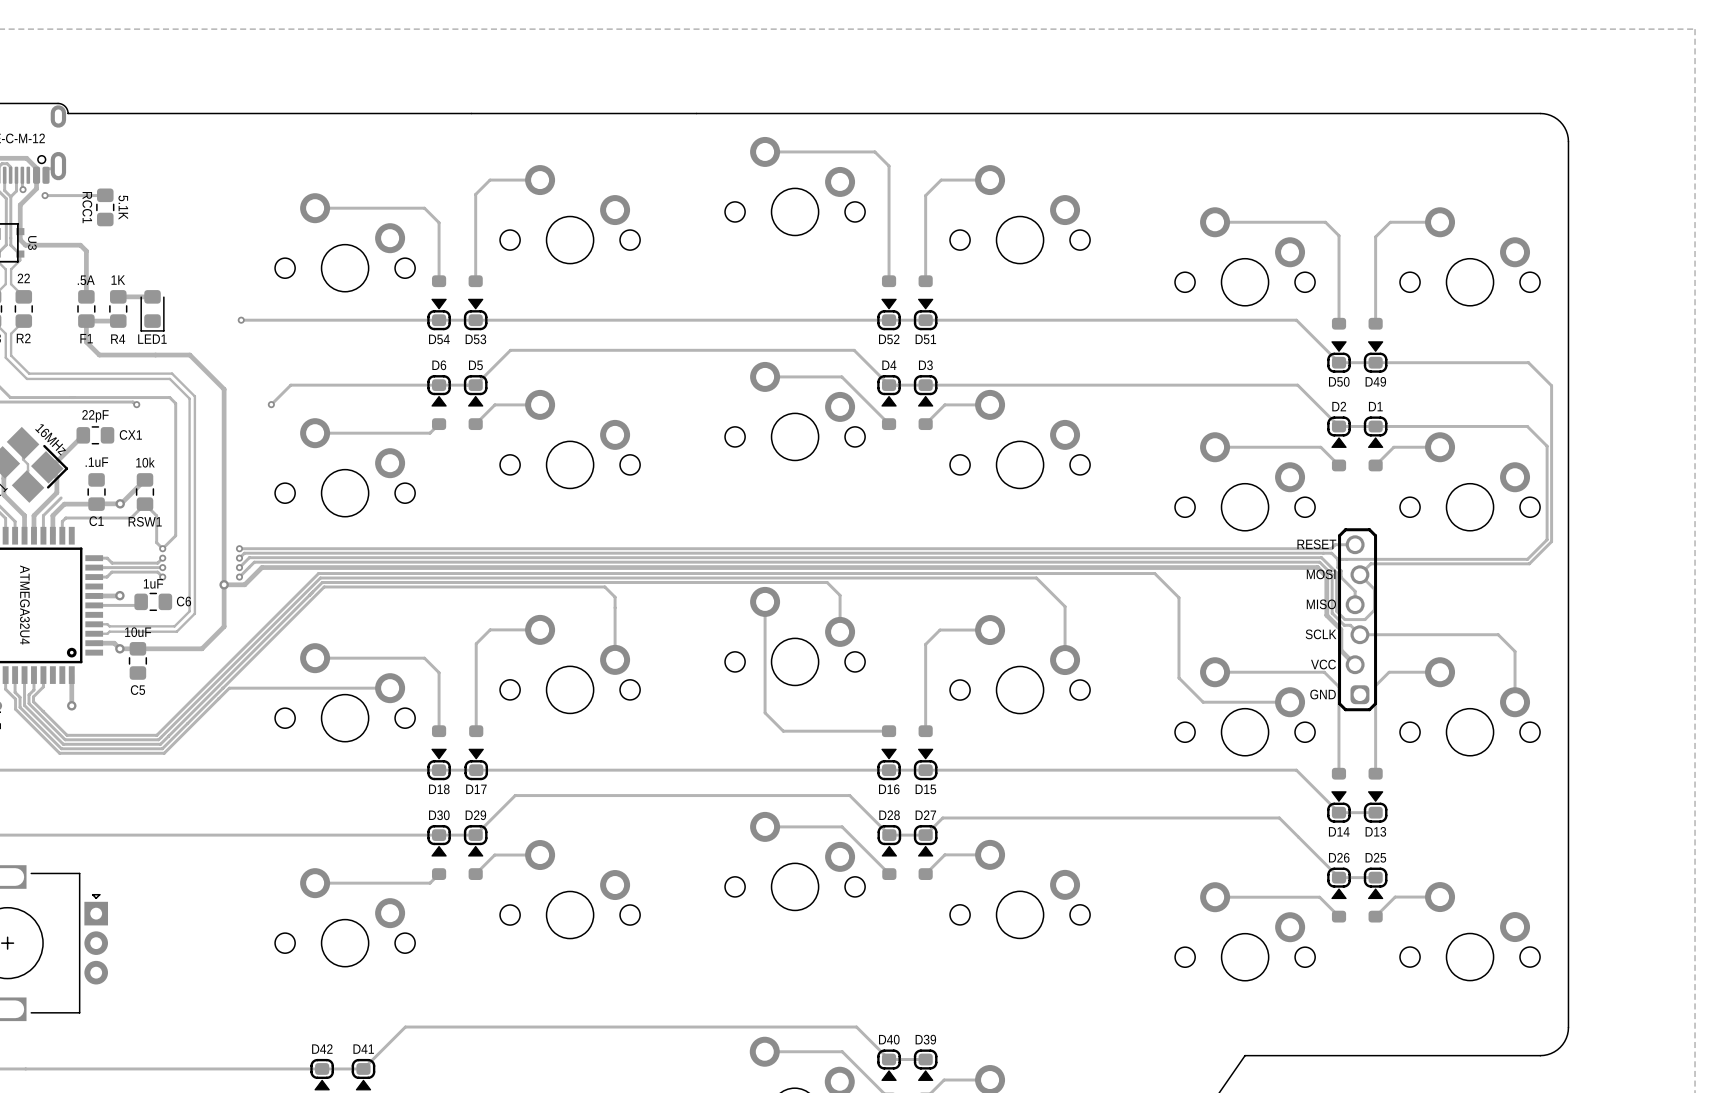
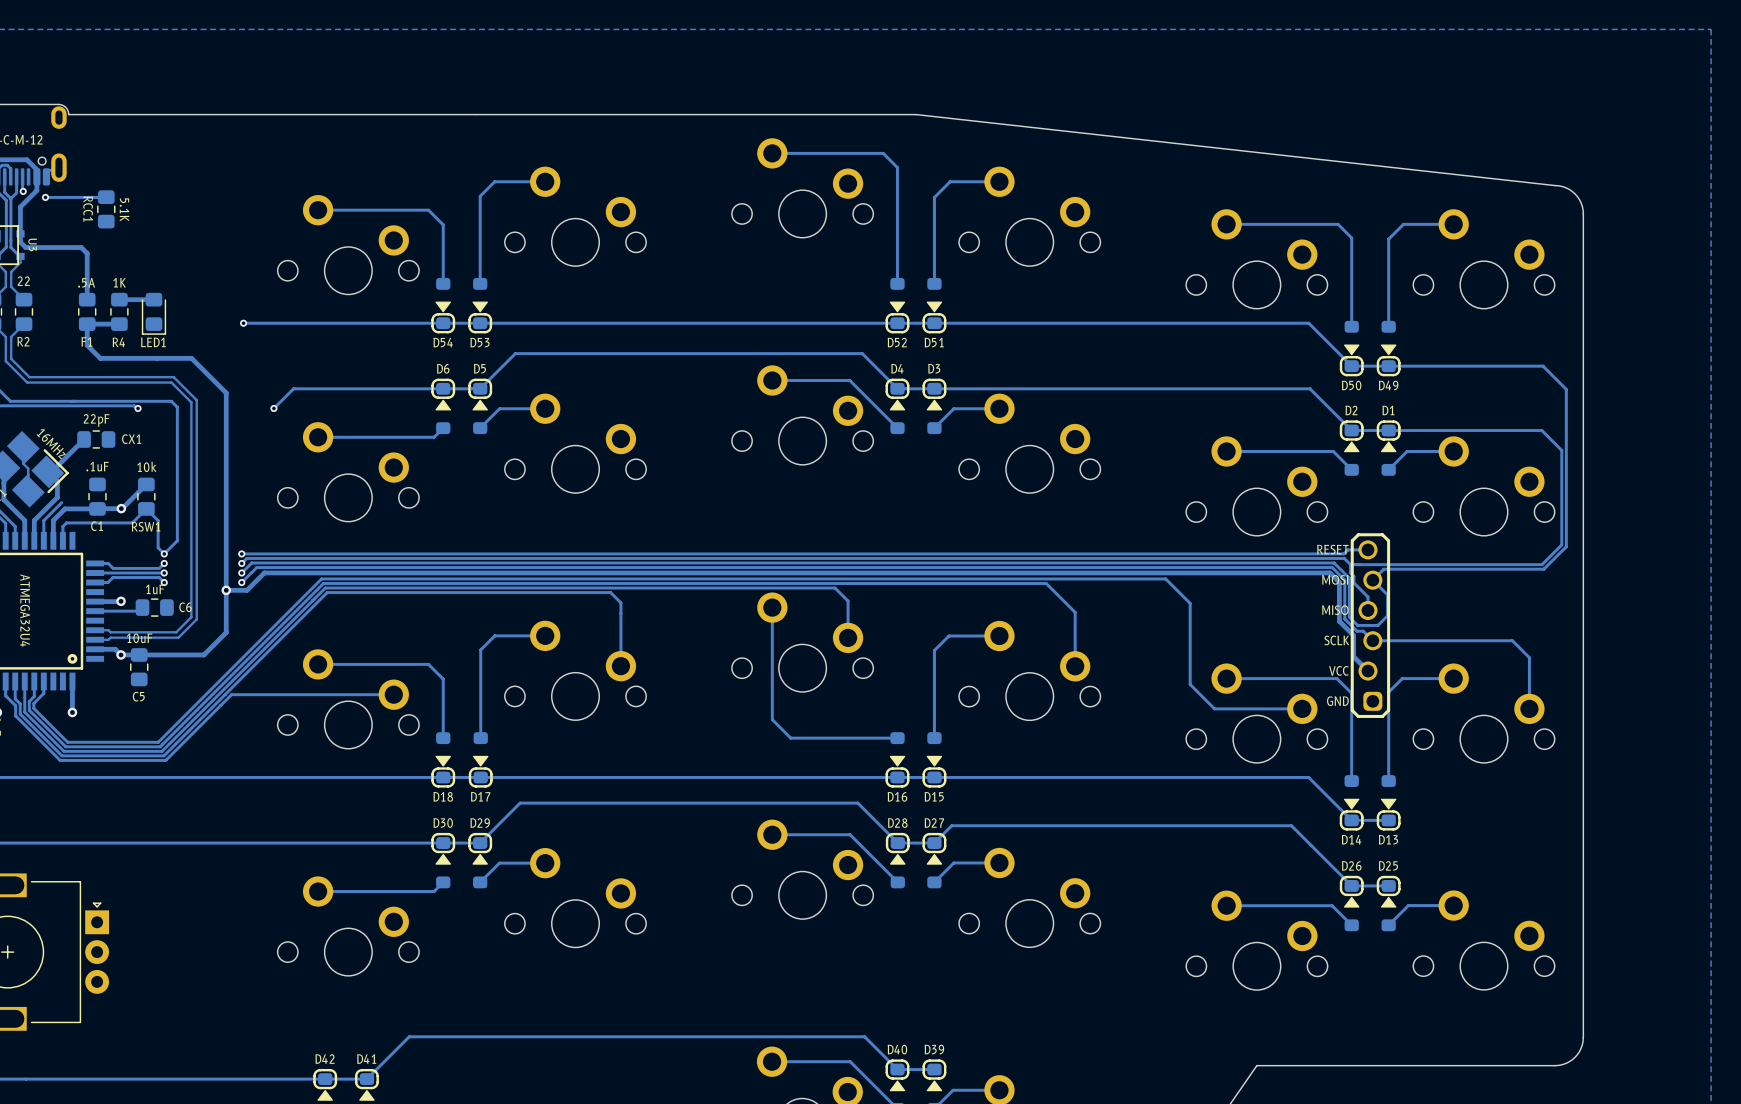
board edge: (907, 113) (1544, 113) (1557, 119) (1567, 134) (1568, 211) -> (916, 114) (1558, 185) (1575, 193) (1581, 203) (1583, 213)

